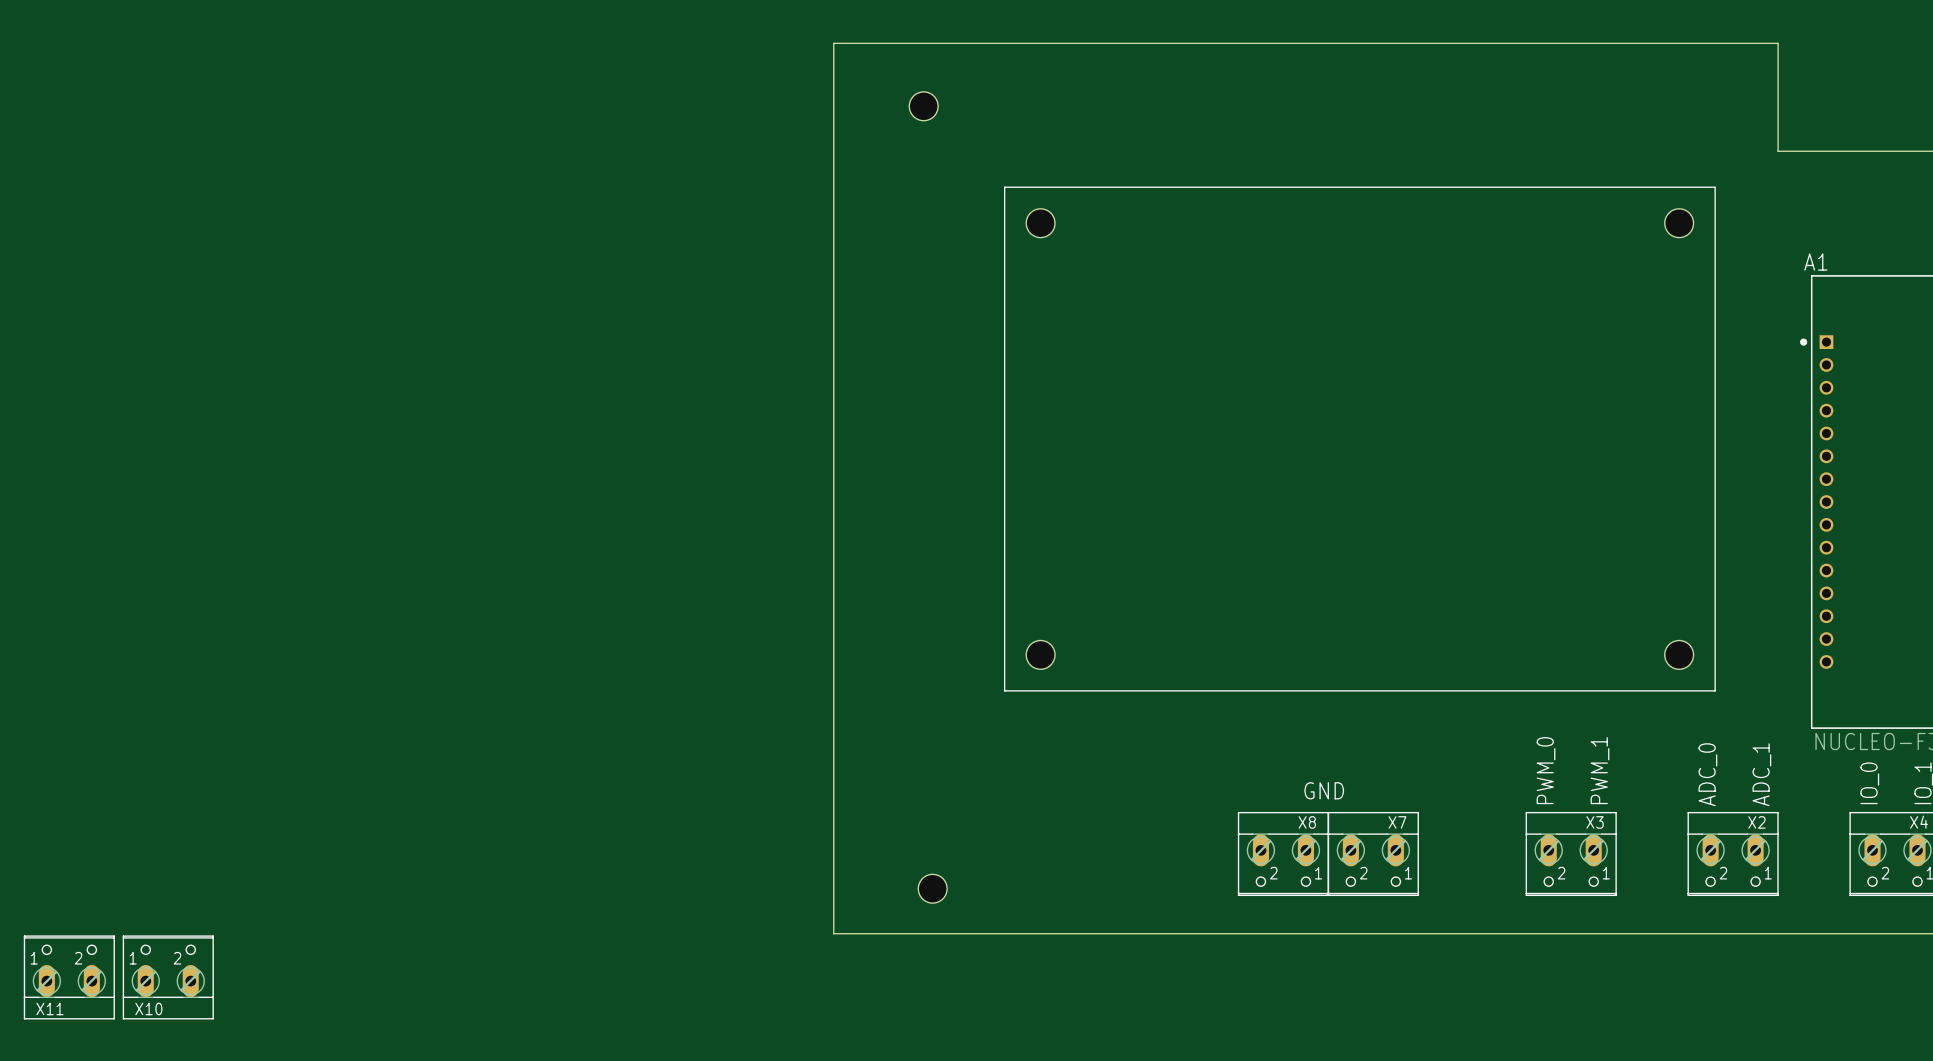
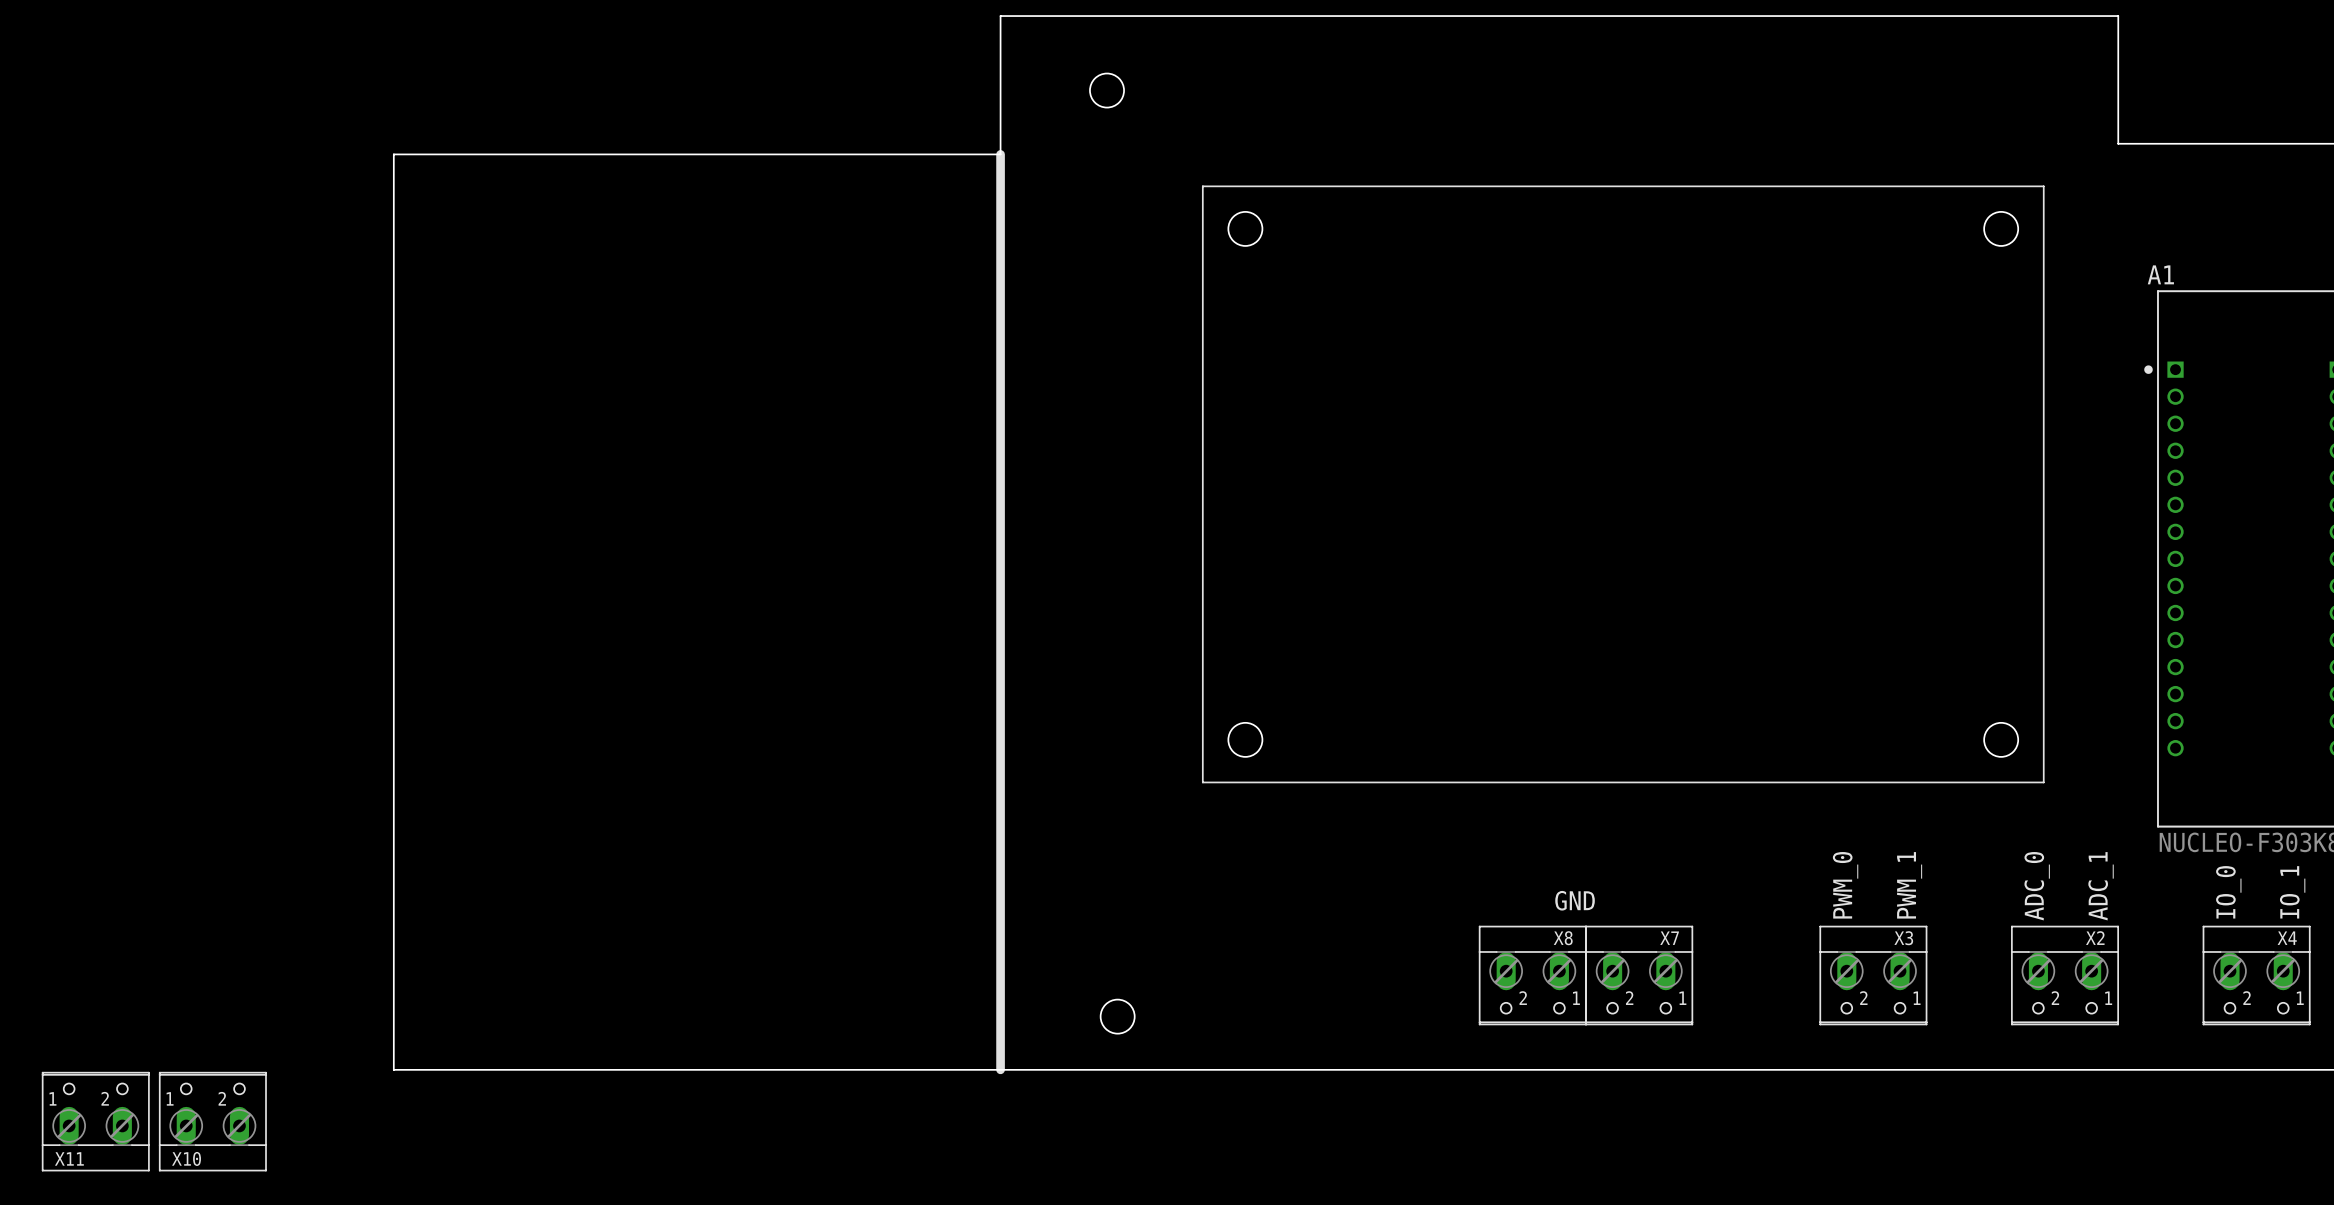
board edge: (833, 160) (833, 933) -> (1000, 154) (393, 154) (393, 1069) (1000, 1069)
line: none -> (1000, 154) (1000, 1069)

